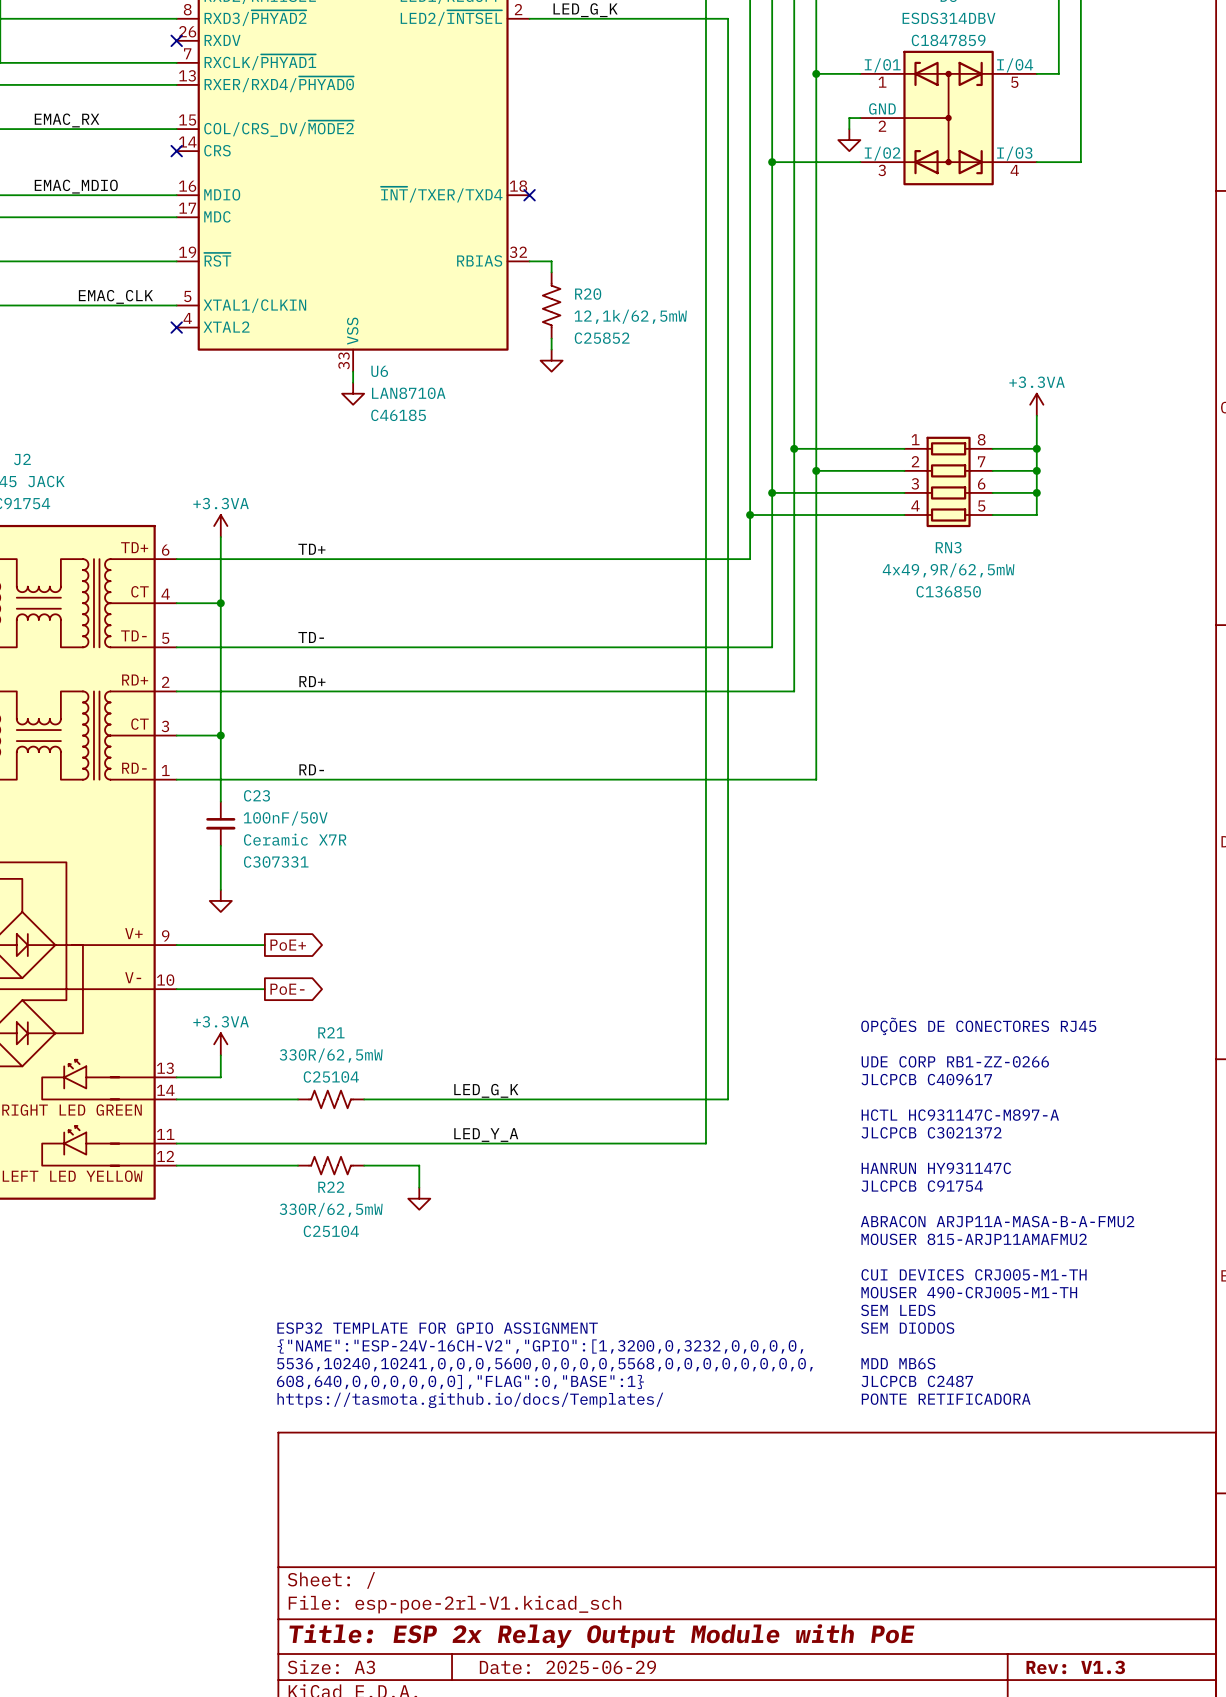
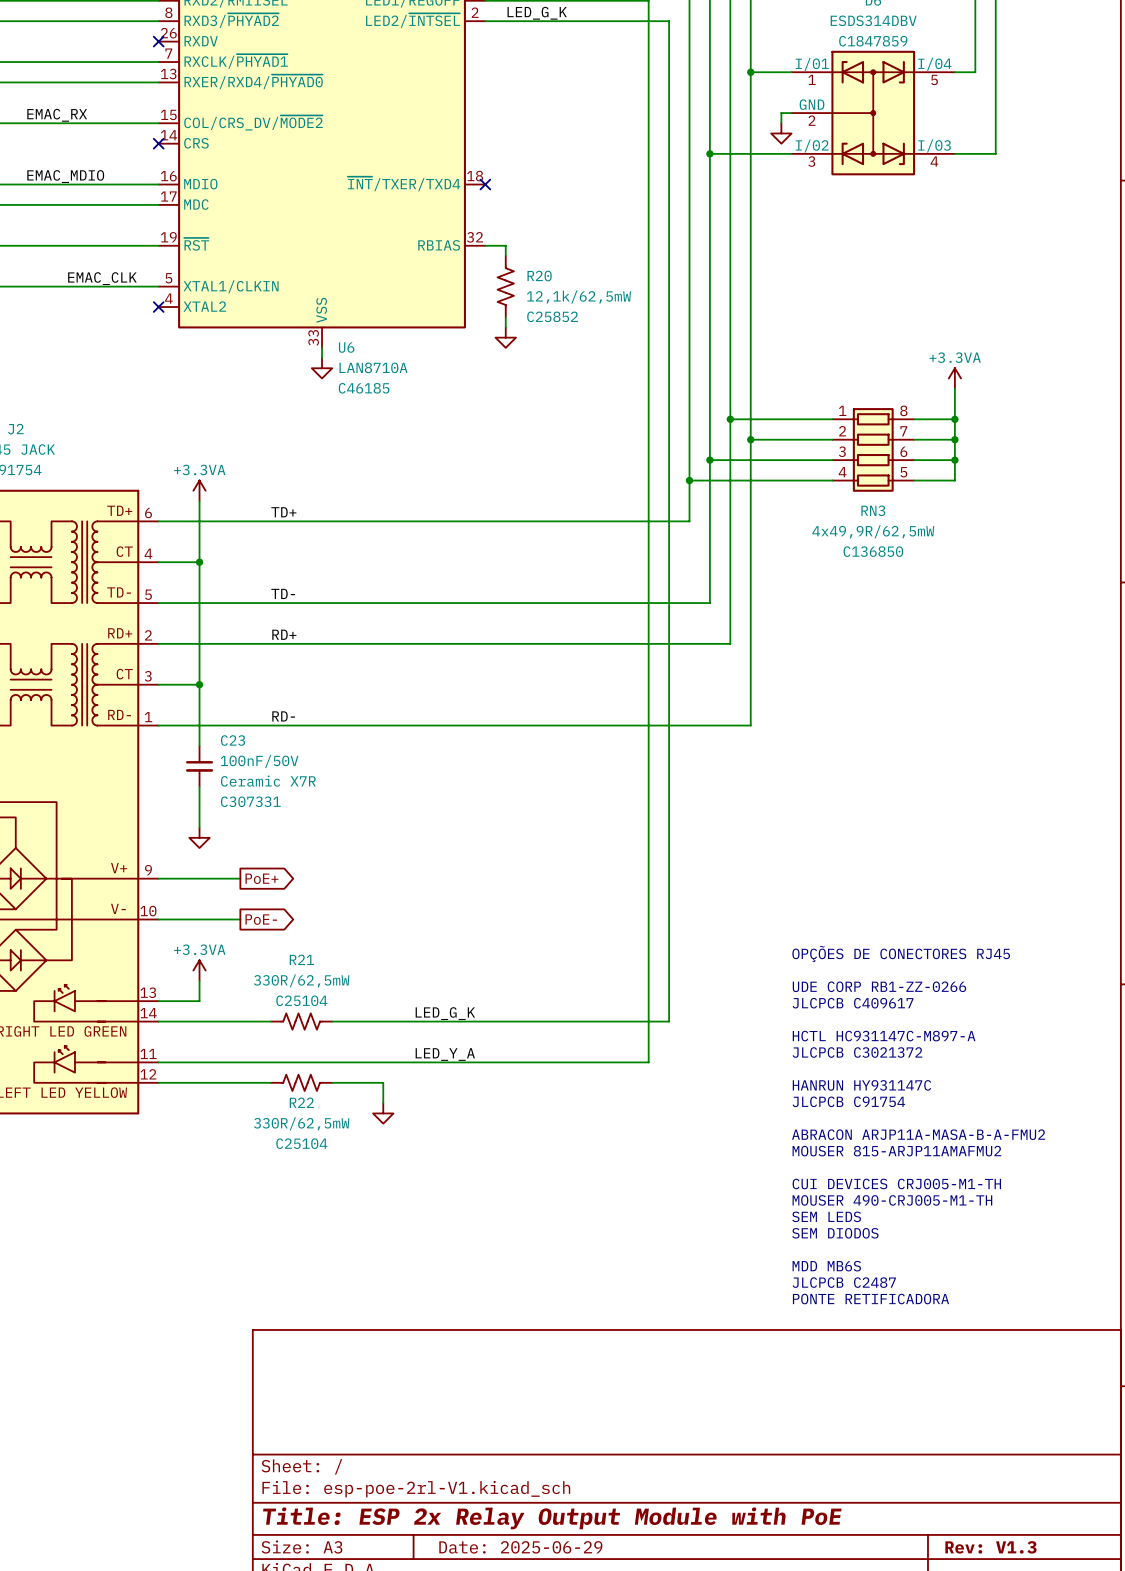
text: ESP32 TEMPLATE FOR GPIO ASSIGNMENT (437, 1328) -> none
text: {"NAME":"ESP-24V-16CH-V2","GPIO":[1,3200,0,3232,0,0,0,0, (540, 1346) -> none
text: 5536,10240,10241,0,0,0,5600,0,0,0,0,5568,0,0,0,0,0,0,0,0, (544, 1364) -> none
text: 608,640,0,0,0,0,0,0],"FLAG":0,"BASE":1} (460, 1382) -> none
text: https://tasmota.github.io/docs/Templates/ (470, 1400) -> none

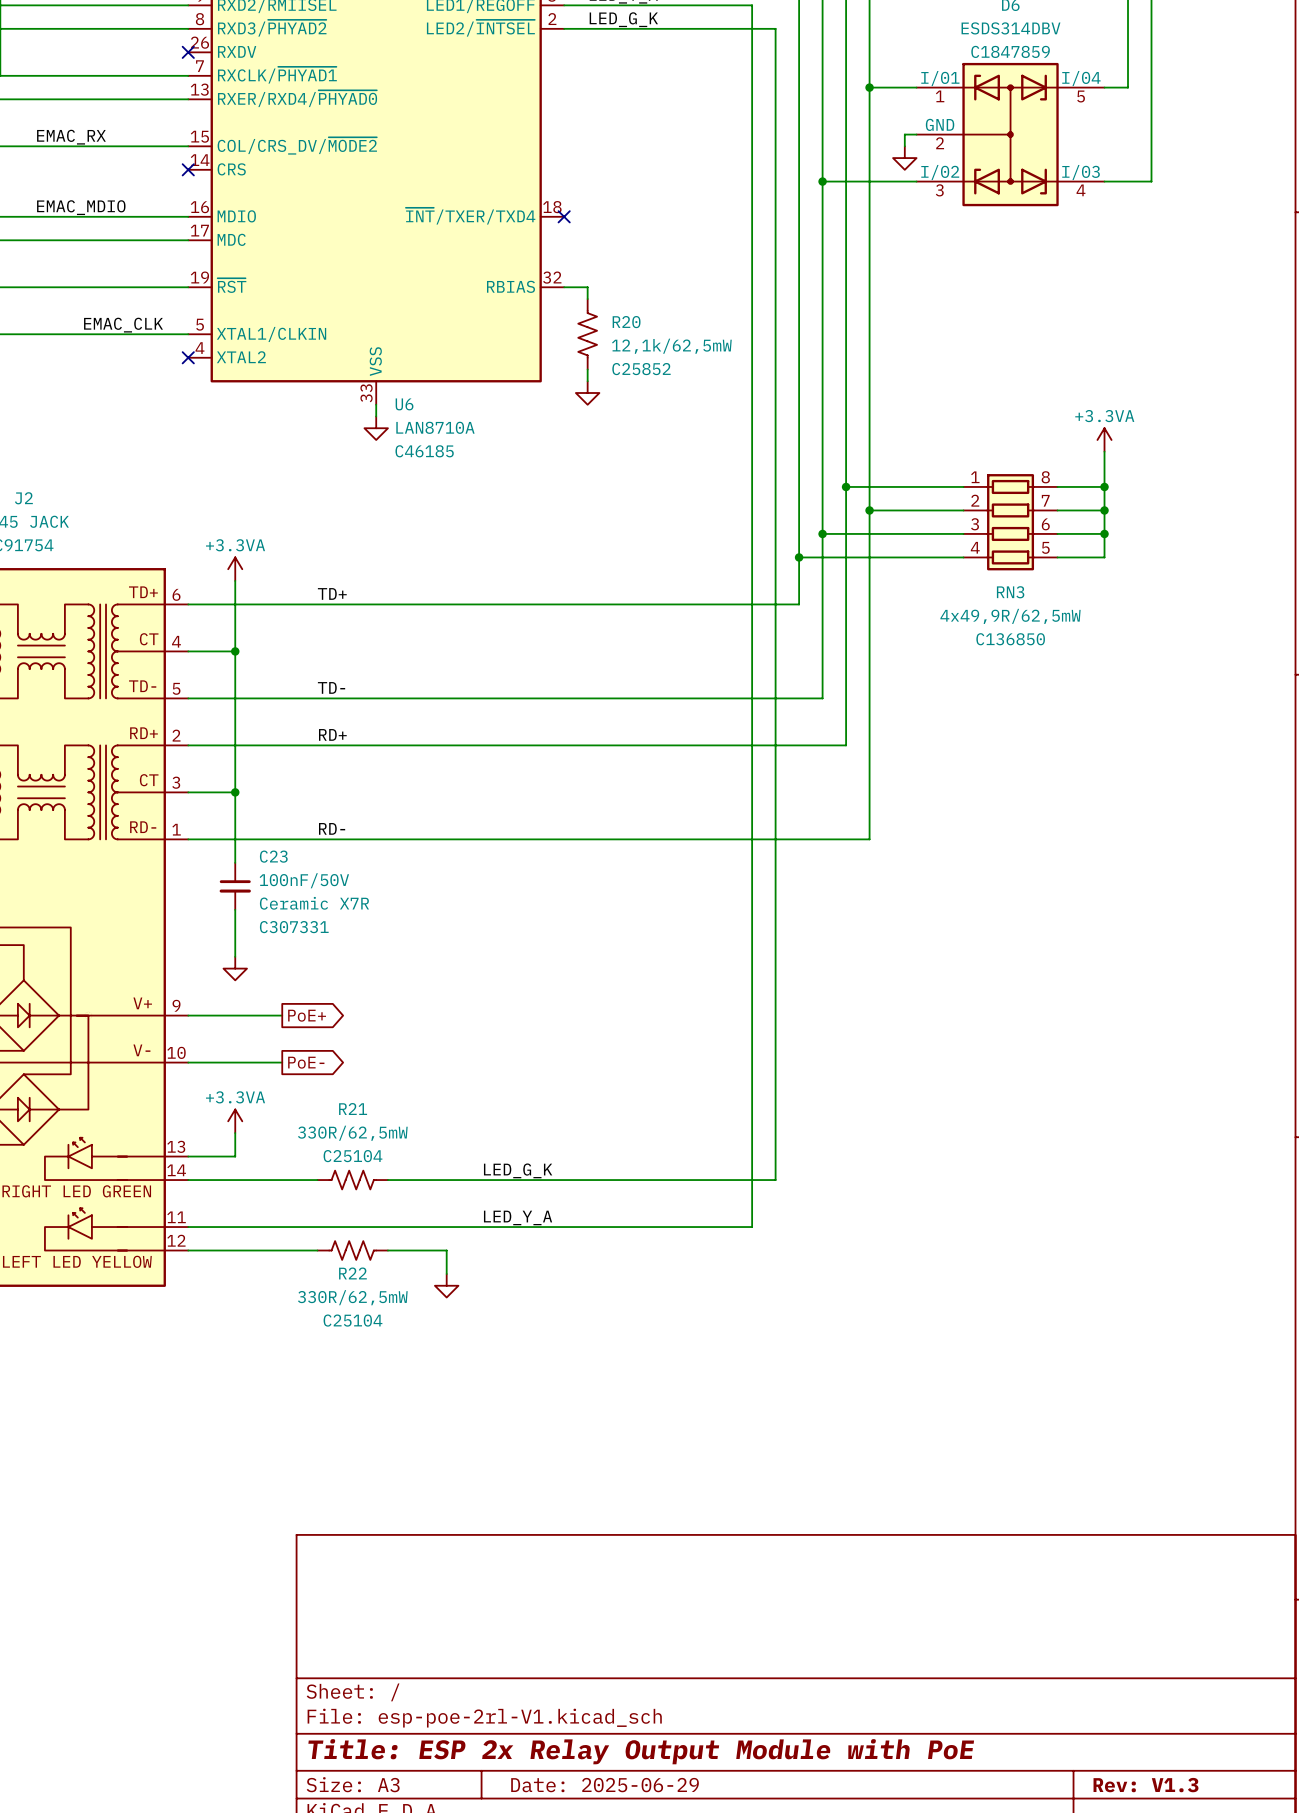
text: OPÇÕES DE CONECTORES RJ45 (901, 953) -> none
text: UDE CORP RB1-ZZ-0266 (879, 986) -> none
text: JLCPCB C409617 (853, 1003) -> none
text: HCTL HC931147C-M897-A (884, 1036) -> none
text: JLCPCB C3021372 (857, 1052) -> none
text: HANRUN HY931147C (861, 1085) -> none
text: JLCPCB C91754 (848, 1101) -> none
text: ABRACON ARJP11A-MASA-B-A-FMU2 (918, 1134) -> none
text: MOUSER 815-ARJP11AMAFMU2 (896, 1151) -> none
text: CUI DEVICES CRJ005-M1-TH (896, 1183) -> none
text: MOUSER 490-CRJ005-M1-TH (892, 1200) -> none
text: SEM LEDS (826, 1216) -> none
text: SEM DIODOS (835, 1233) -> none
text: MDD MB6S (826, 1266) -> none
text: JLCPCB C2487 (844, 1282) -> none
text: PONTE RETIFICADORA (871, 1299) -> none

